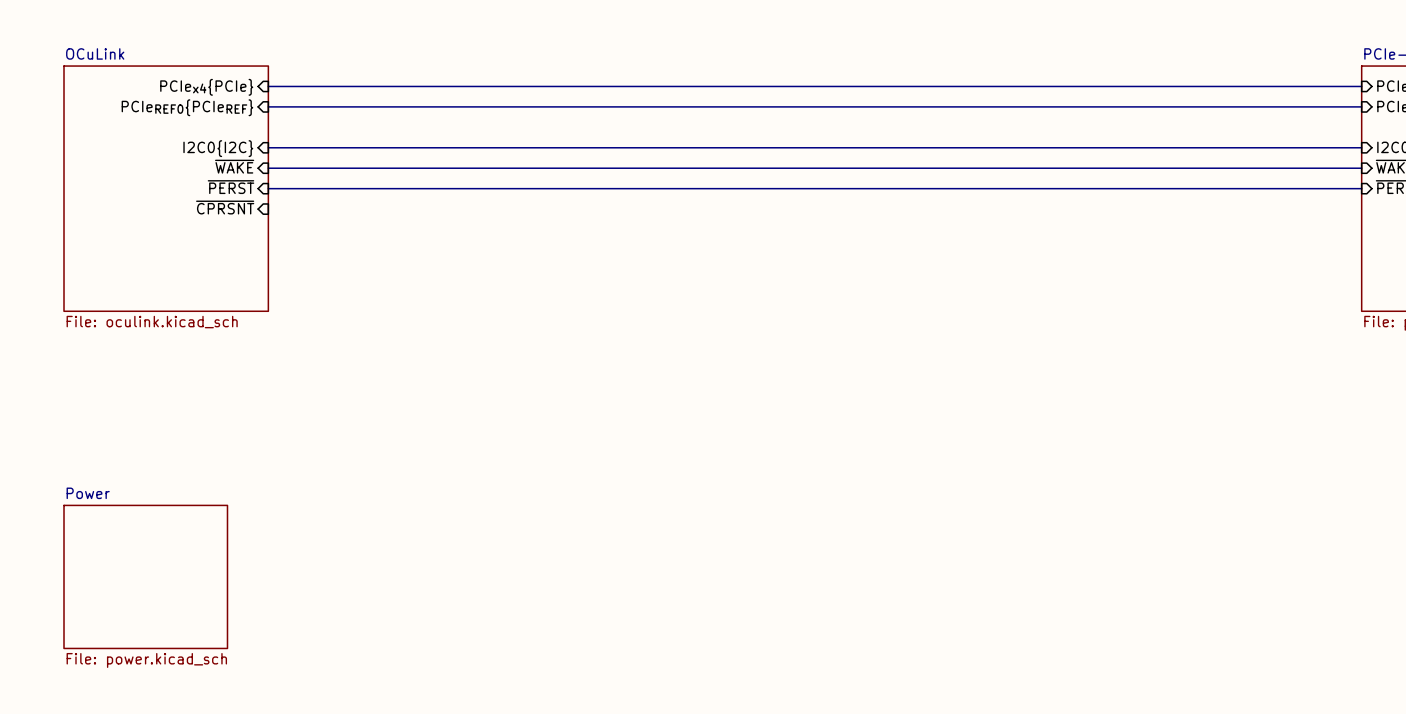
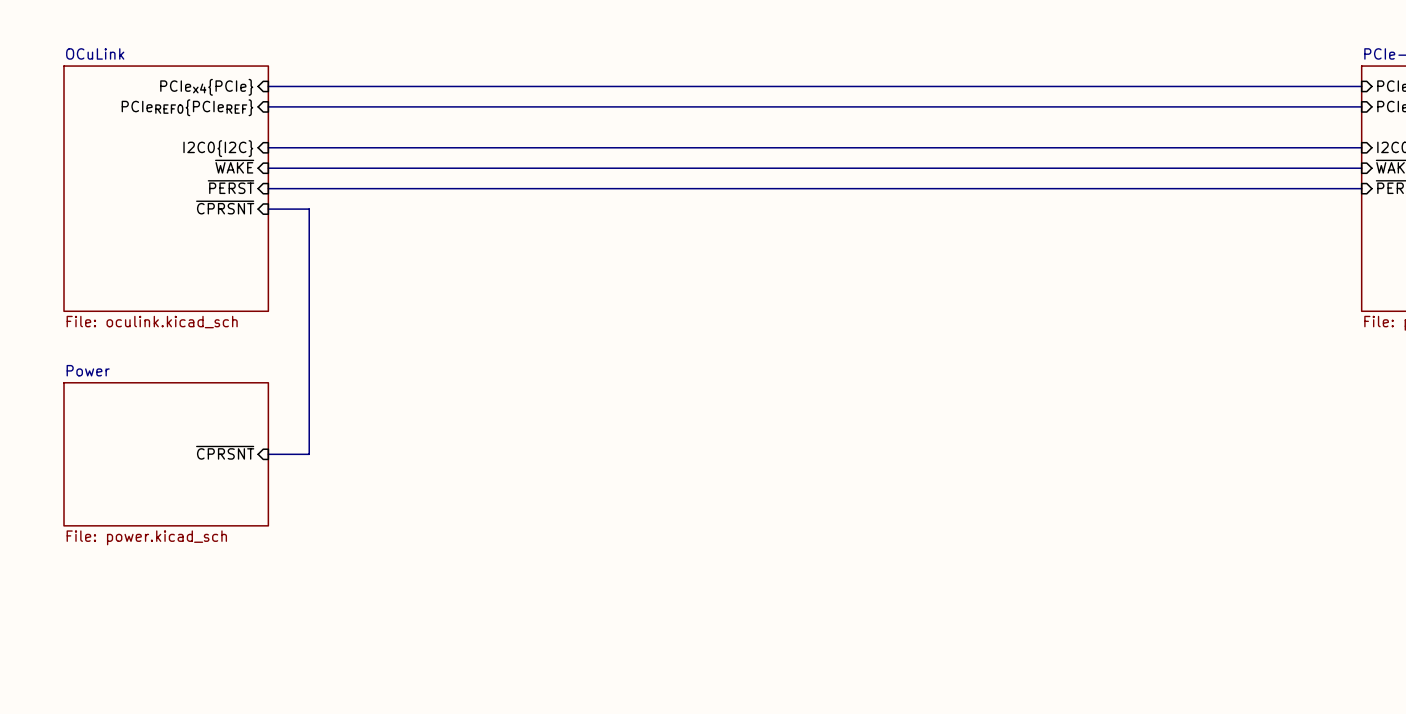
wire: none -> (268, 209) (309, 209) (309, 454) (268, 454)
sheet pin: none -> ~{CPRSNT} (225, 452)
sheet Power: none -> File: power.kicad_sch (166, 454)
sheet Power: File: power.kicad_sch (145, 576) -> none

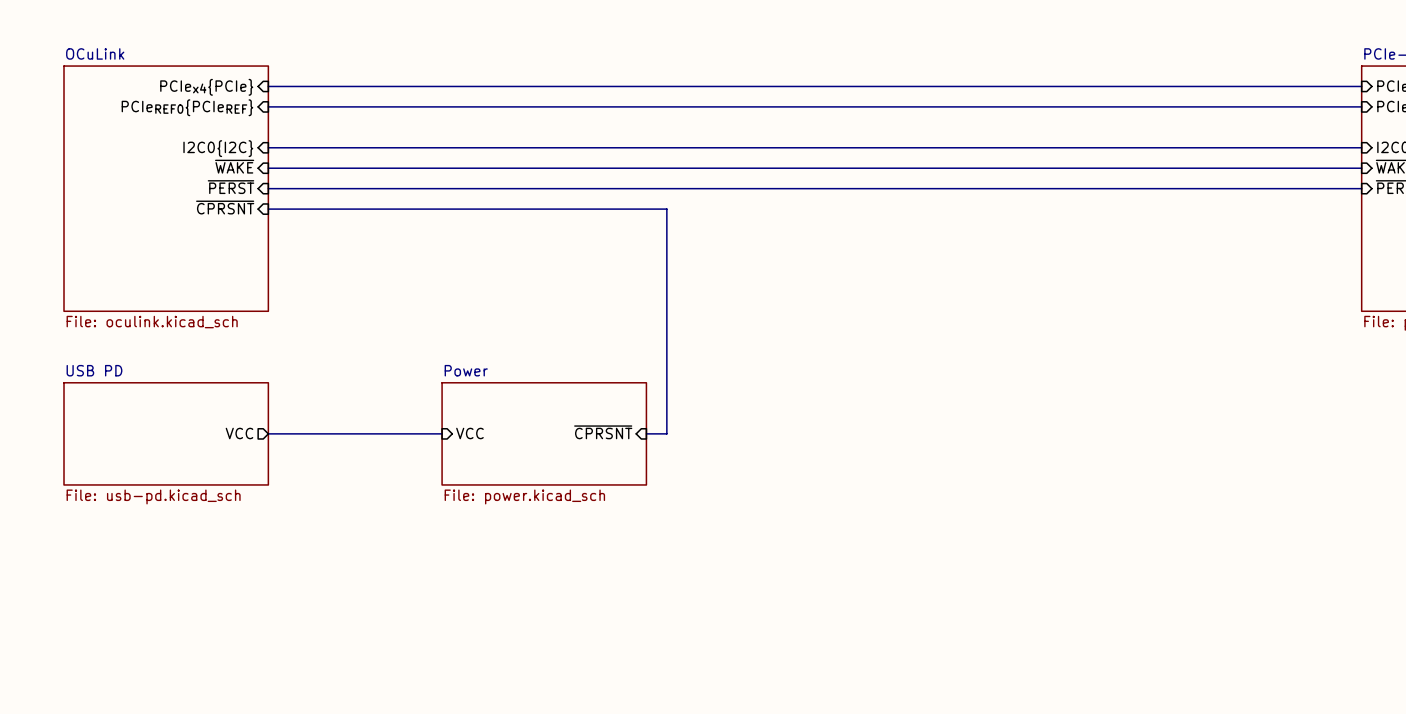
wire: (309, 209) (309, 454) (268, 454) -> (309, 209) (666, 209) (666, 433) (646, 433)
sheet pin: none -> ~{CPRSNT} (603, 432)
sheet USB PD: none -> File: usb-pd.kicad_sch (166, 433)
sheet pin: none -> VCC (239, 433)
wire: none -> (268, 433) (442, 433)
sheet pin: none -> VCC (469, 433)
sheet Power: none -> File: power.kicad_sch (544, 433)
sheet pin: ~{CPRSNT} (225, 452) -> none
sheet Power: File: power.kicad_sch (166, 454) -> none

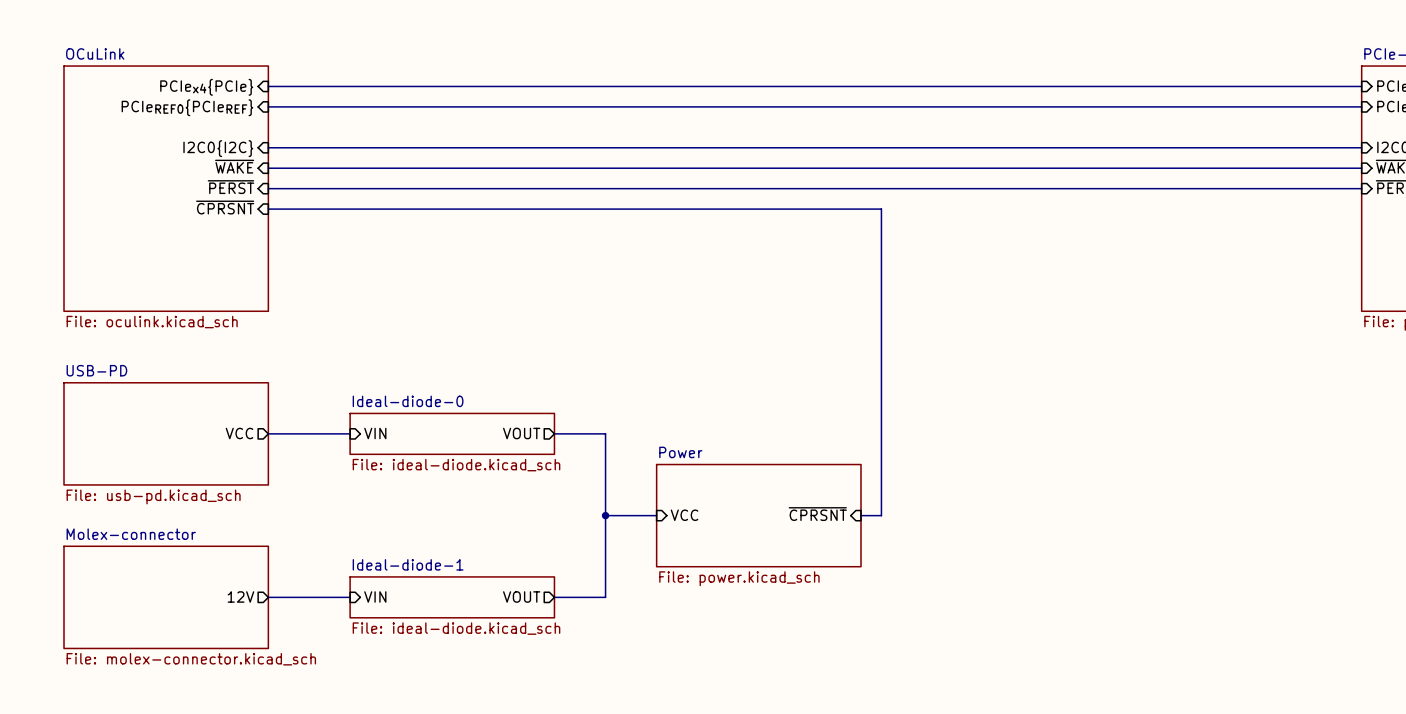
wire: (666, 209) (666, 433) (646, 433) -> (666, 209) (881, 209) (881, 515) (861, 515)
sheet USB PD name: USB PD (94, 370) -> USB-PD (96, 370)
sheet pin: ~{CPRSNT} (603, 432) -> none
wire: (350, 433) (442, 433) -> none
sheet pin: none -> VIN (375, 433)
sheet Ideal-diode-0: none -> File: ideal-diode.kicad_sch (452, 433)
sheet pin: VCC (469, 433) -> none
sheet pin: none -> VOUT (521, 433)
sheet Power: File: power.kicad_sch (544, 433) -> none
wire: none -> (554, 433) (605, 433) (605, 597) (554, 597)
sheet pin: none -> ~{CPRSNT} (817, 514)
wire: none -> (605, 515) (656, 515)
junction: none -> (605, 515)
sheet pin: none -> VCC (684, 515)
sheet Power: none -> File: power.kicad_sch (758, 515)
sheet pin: none -> 12V (240, 596)
sheet pin: none -> VIN (375, 596)
sheet pin: none -> VOUT (521, 596)
sheet Molex-connector: none -> File: molex-connector.kicad_sch (166, 597)
wire: none -> (268, 597) (350, 597)
sheet Ideal-diode-1: none -> File: ideal-diode.kicad_sch (452, 597)

